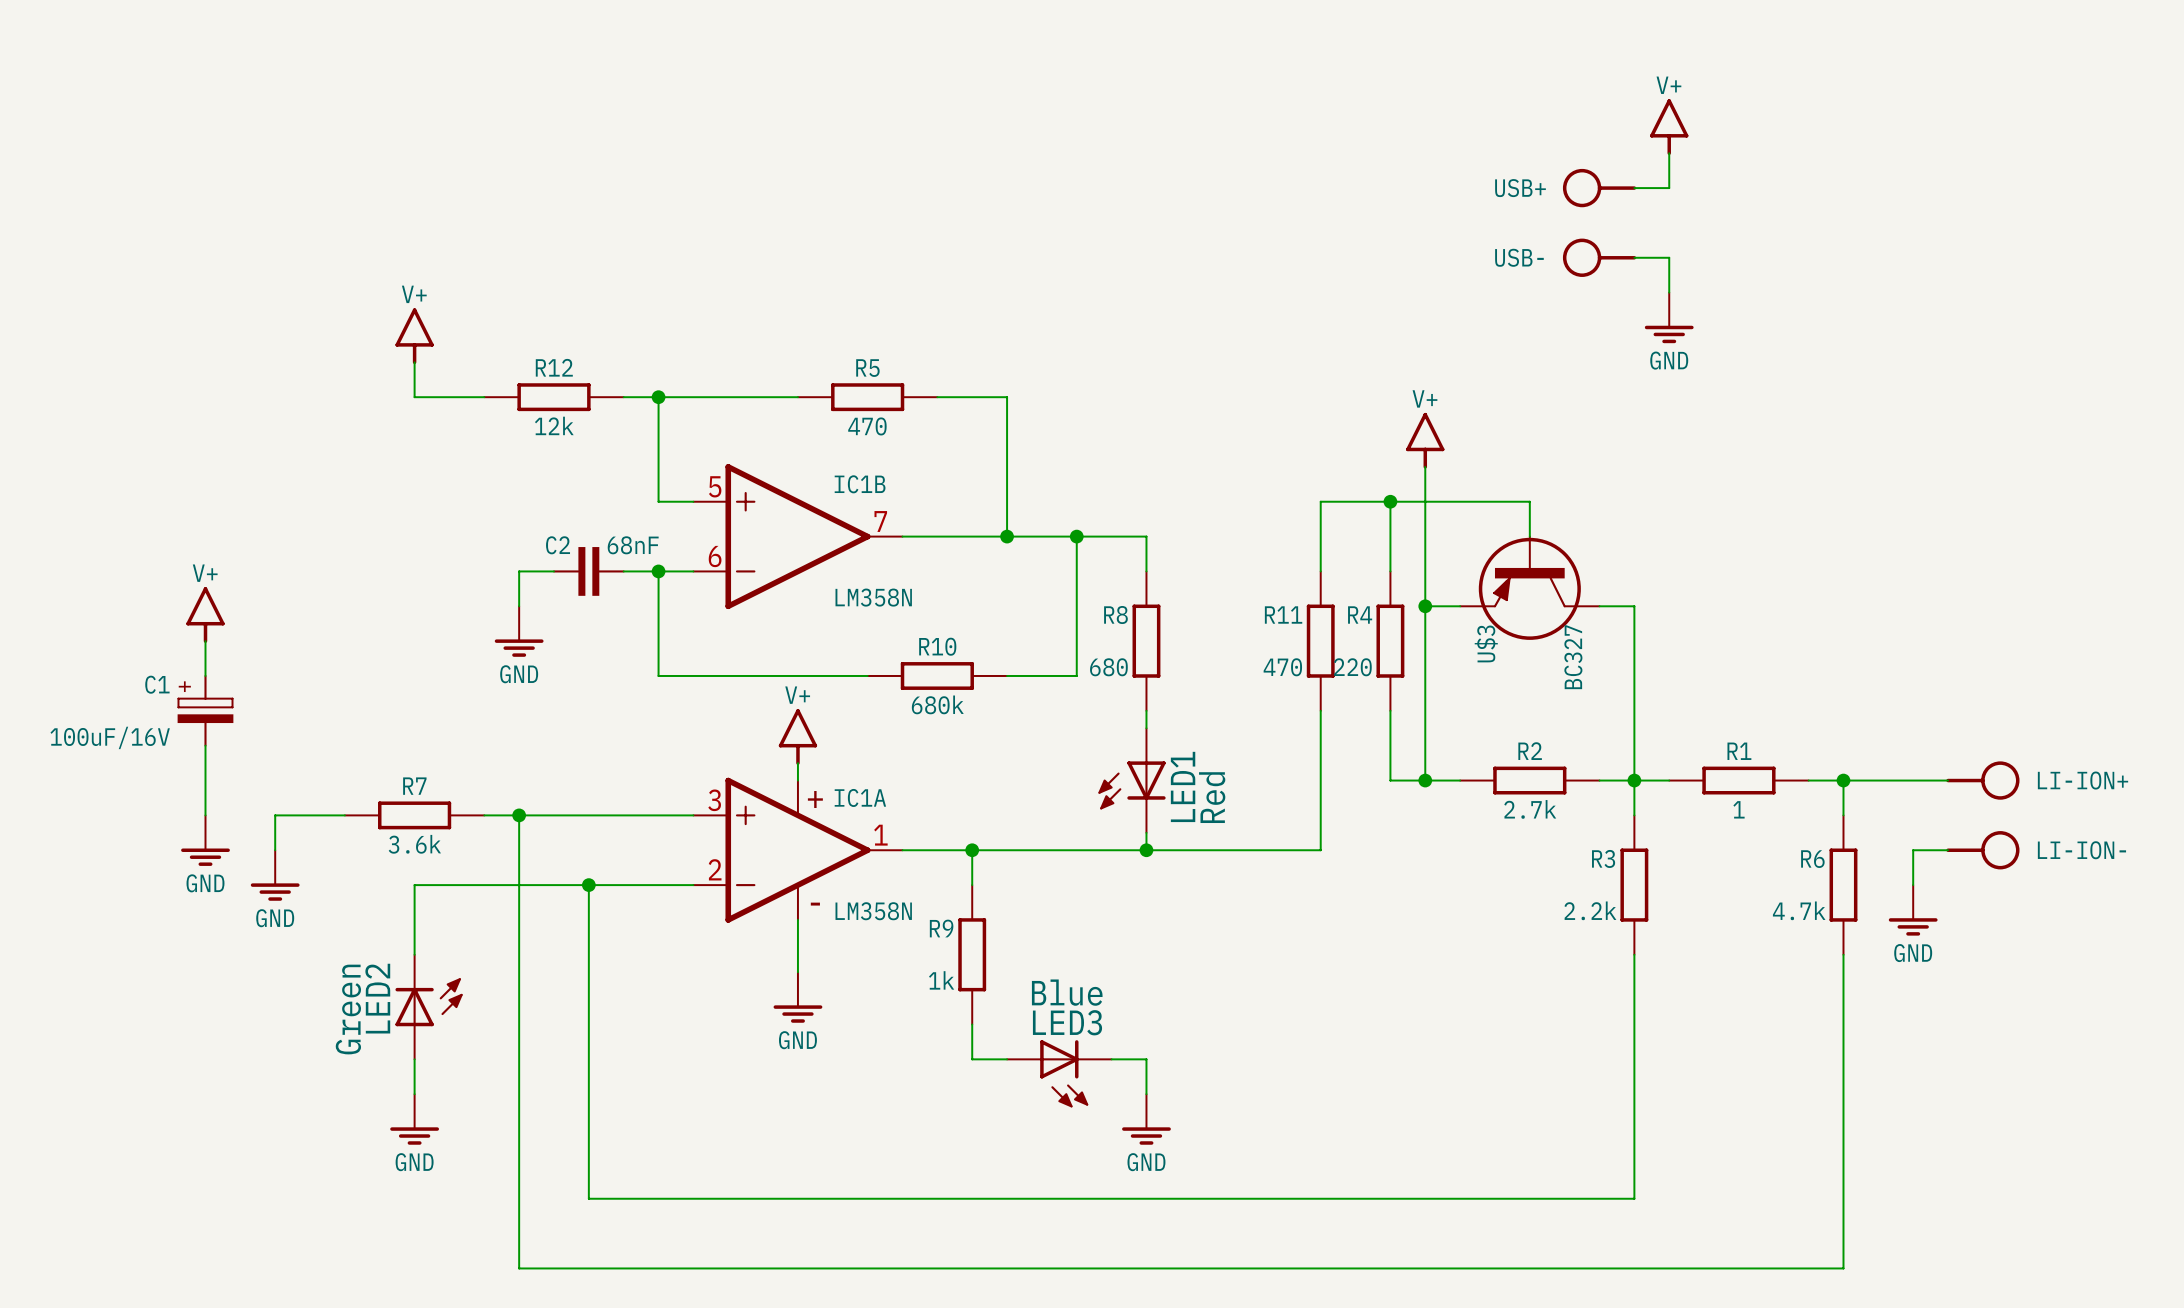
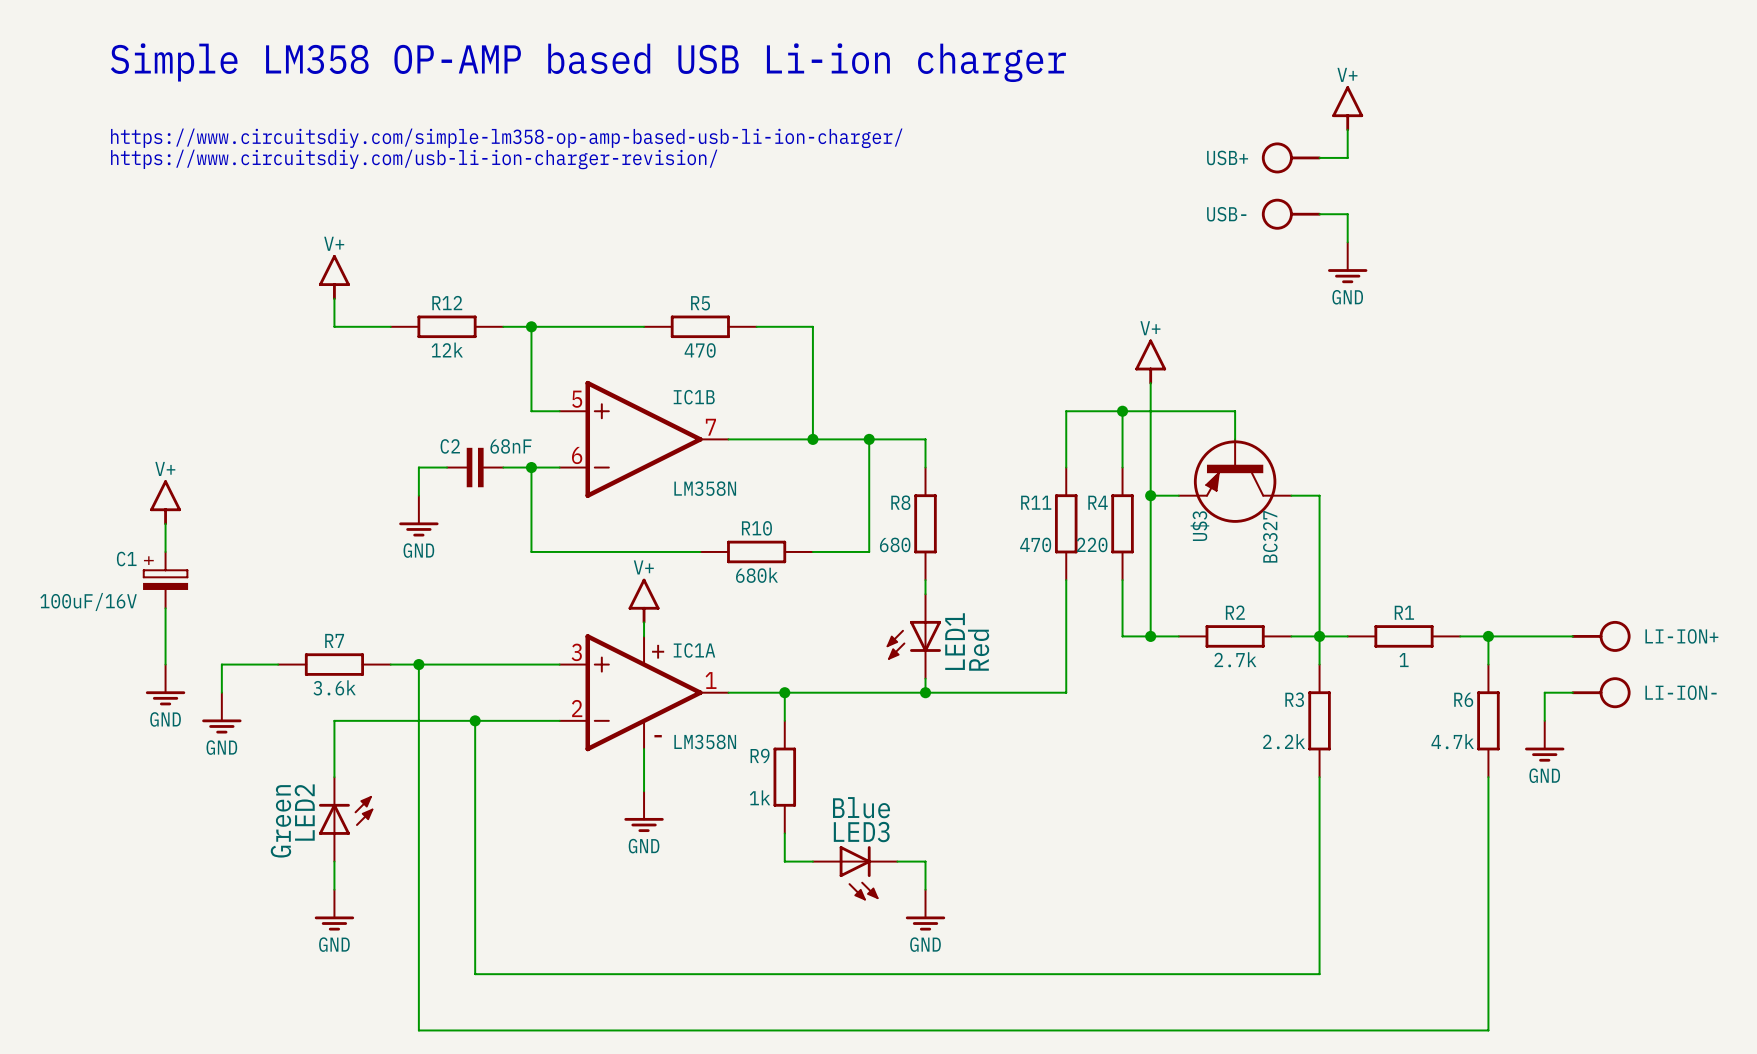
text: none -> Simple LM358 OP-AMP based USB Li-ion charger (588, 62)
text: none -> https://www.circuitsdiy.com/simple-lm358-op-amp-based-usb-li-ion-charger/ (506, 138)
text: none -> https://www.circuitsdiy.com/usb-li-ion-charger-revision/ (414, 159)

